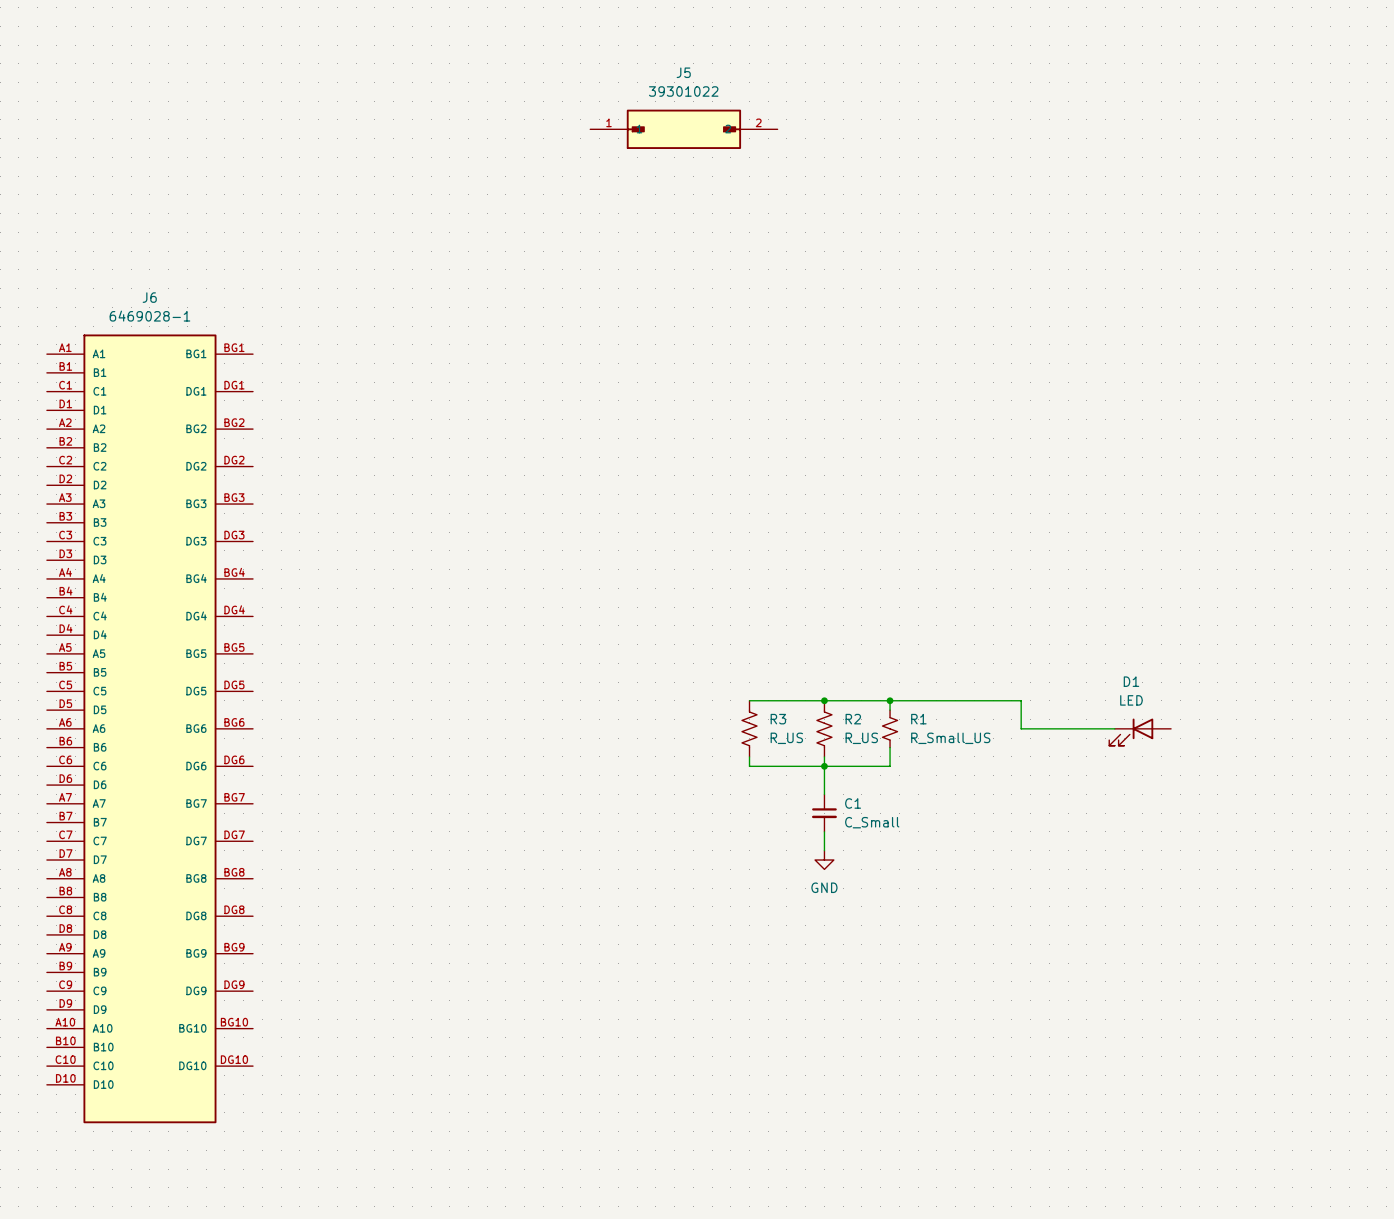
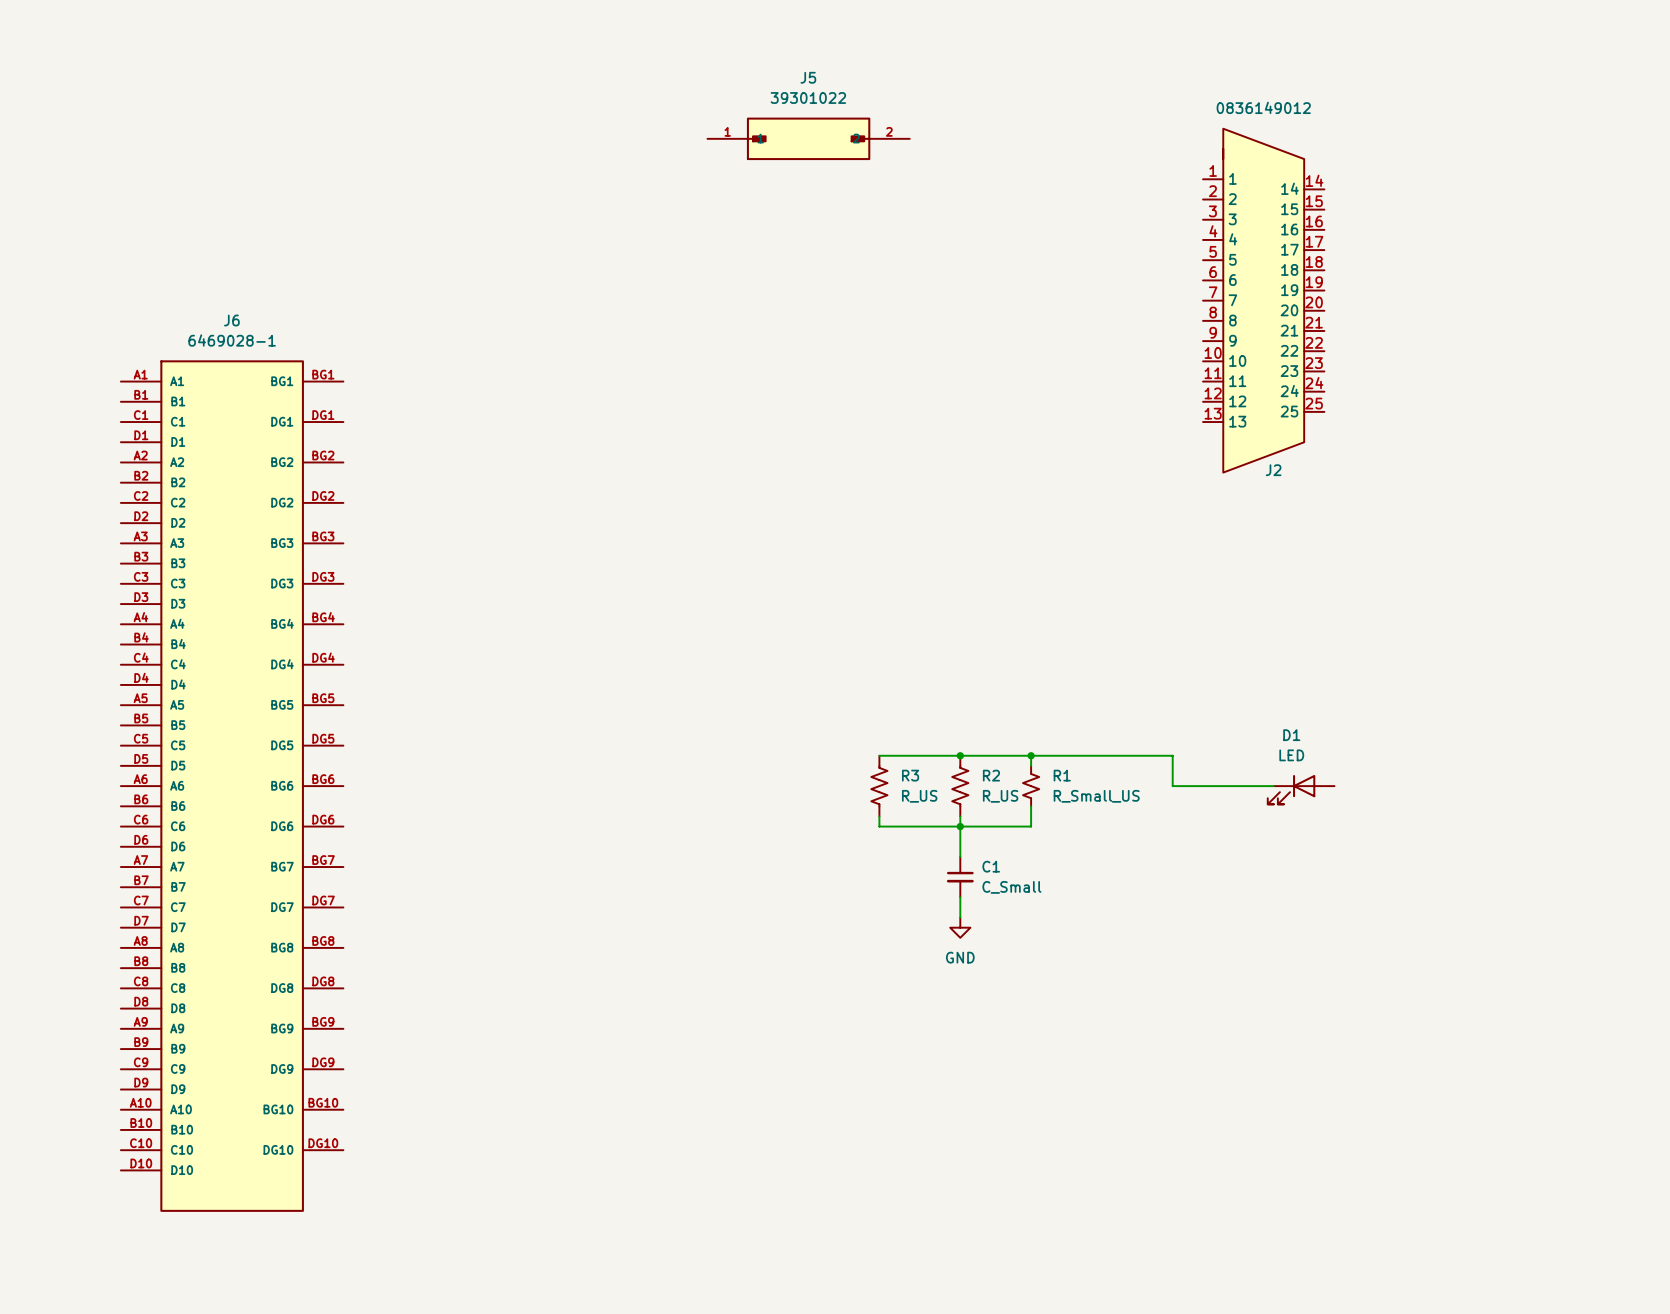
J2: none -> 0836149012 (1263, 300)

